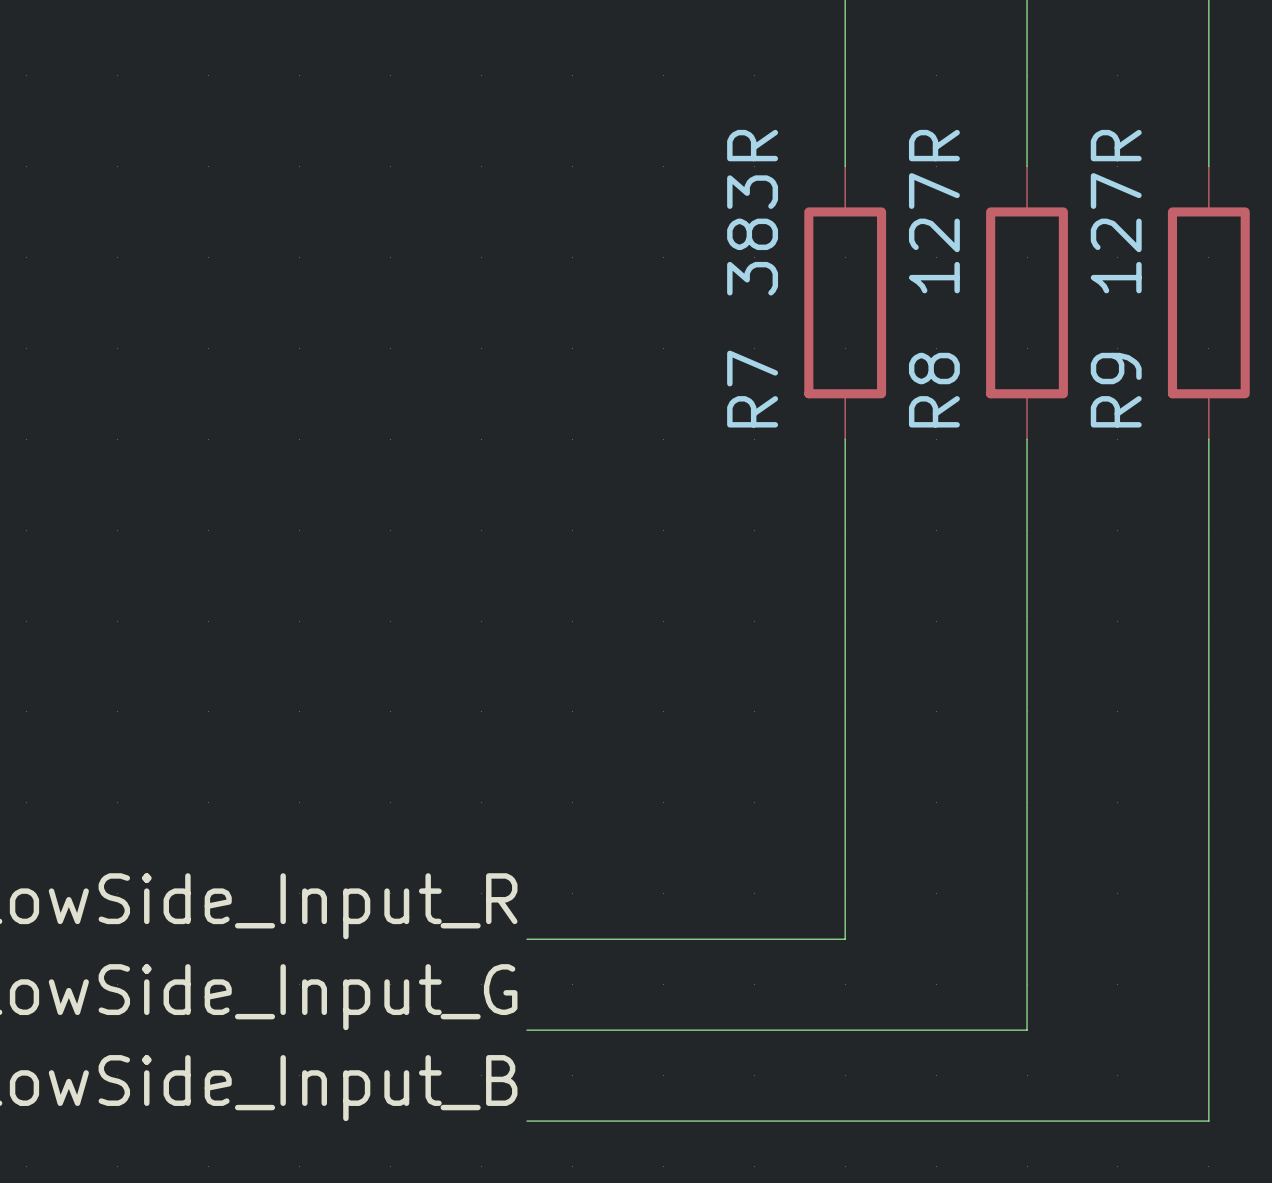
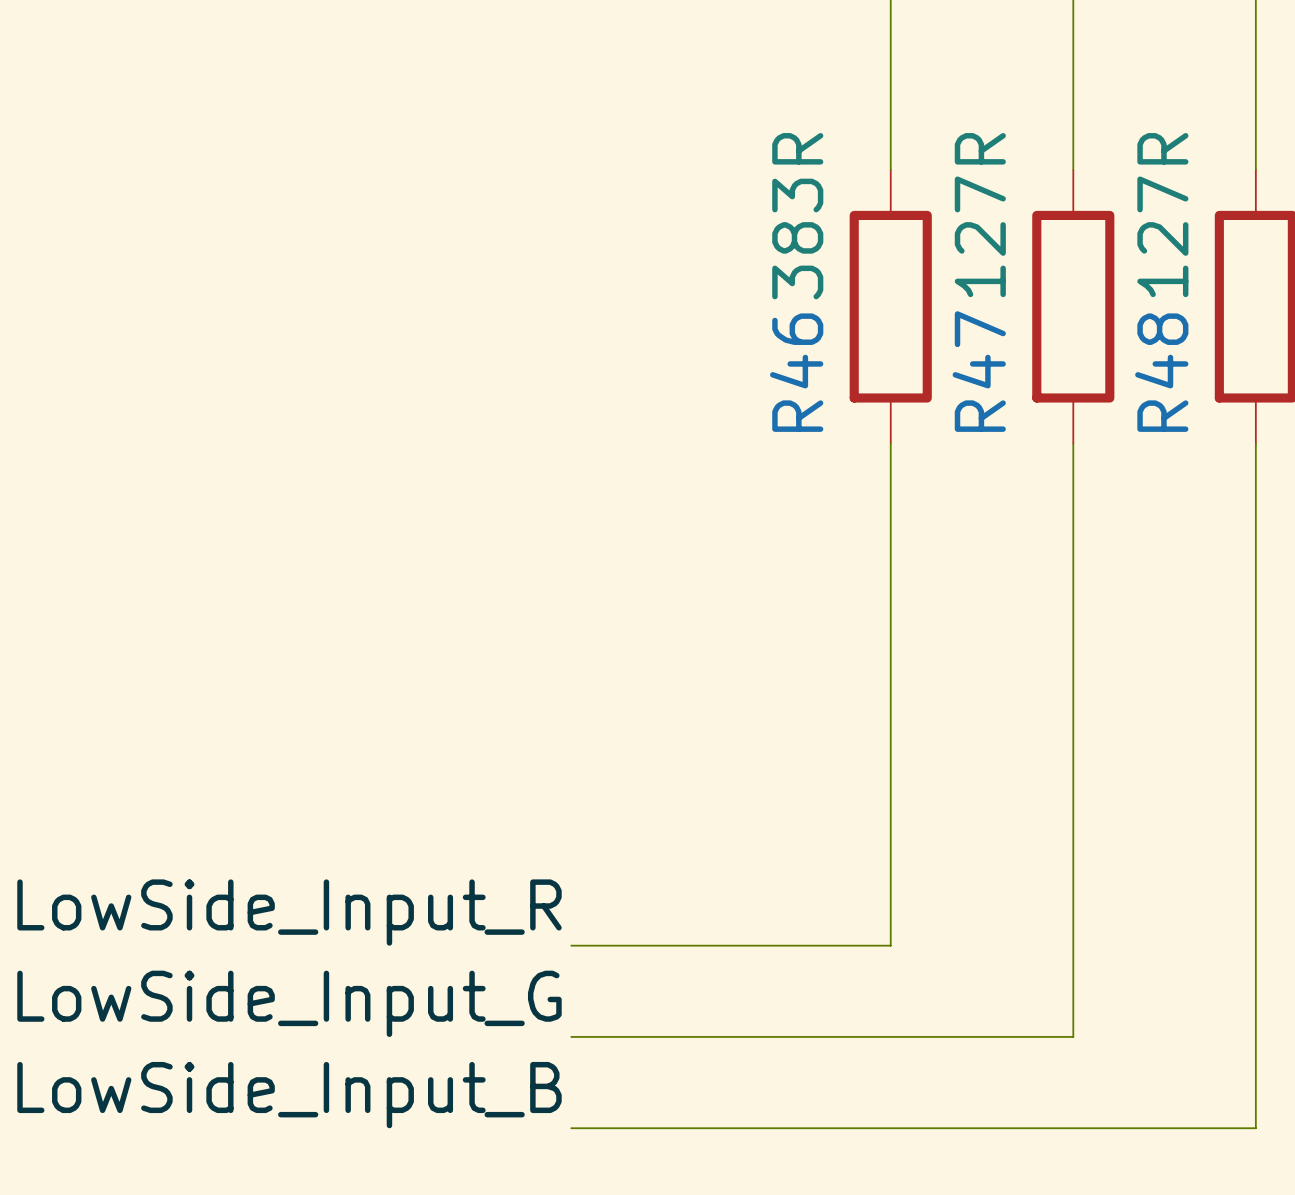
R7 name: R7 (752, 389) -> R46 (796, 372)
R8 name: R8 (934, 390) -> R47 (979, 371)
R9 name: R9 (1116, 390) -> R48 (1161, 372)

